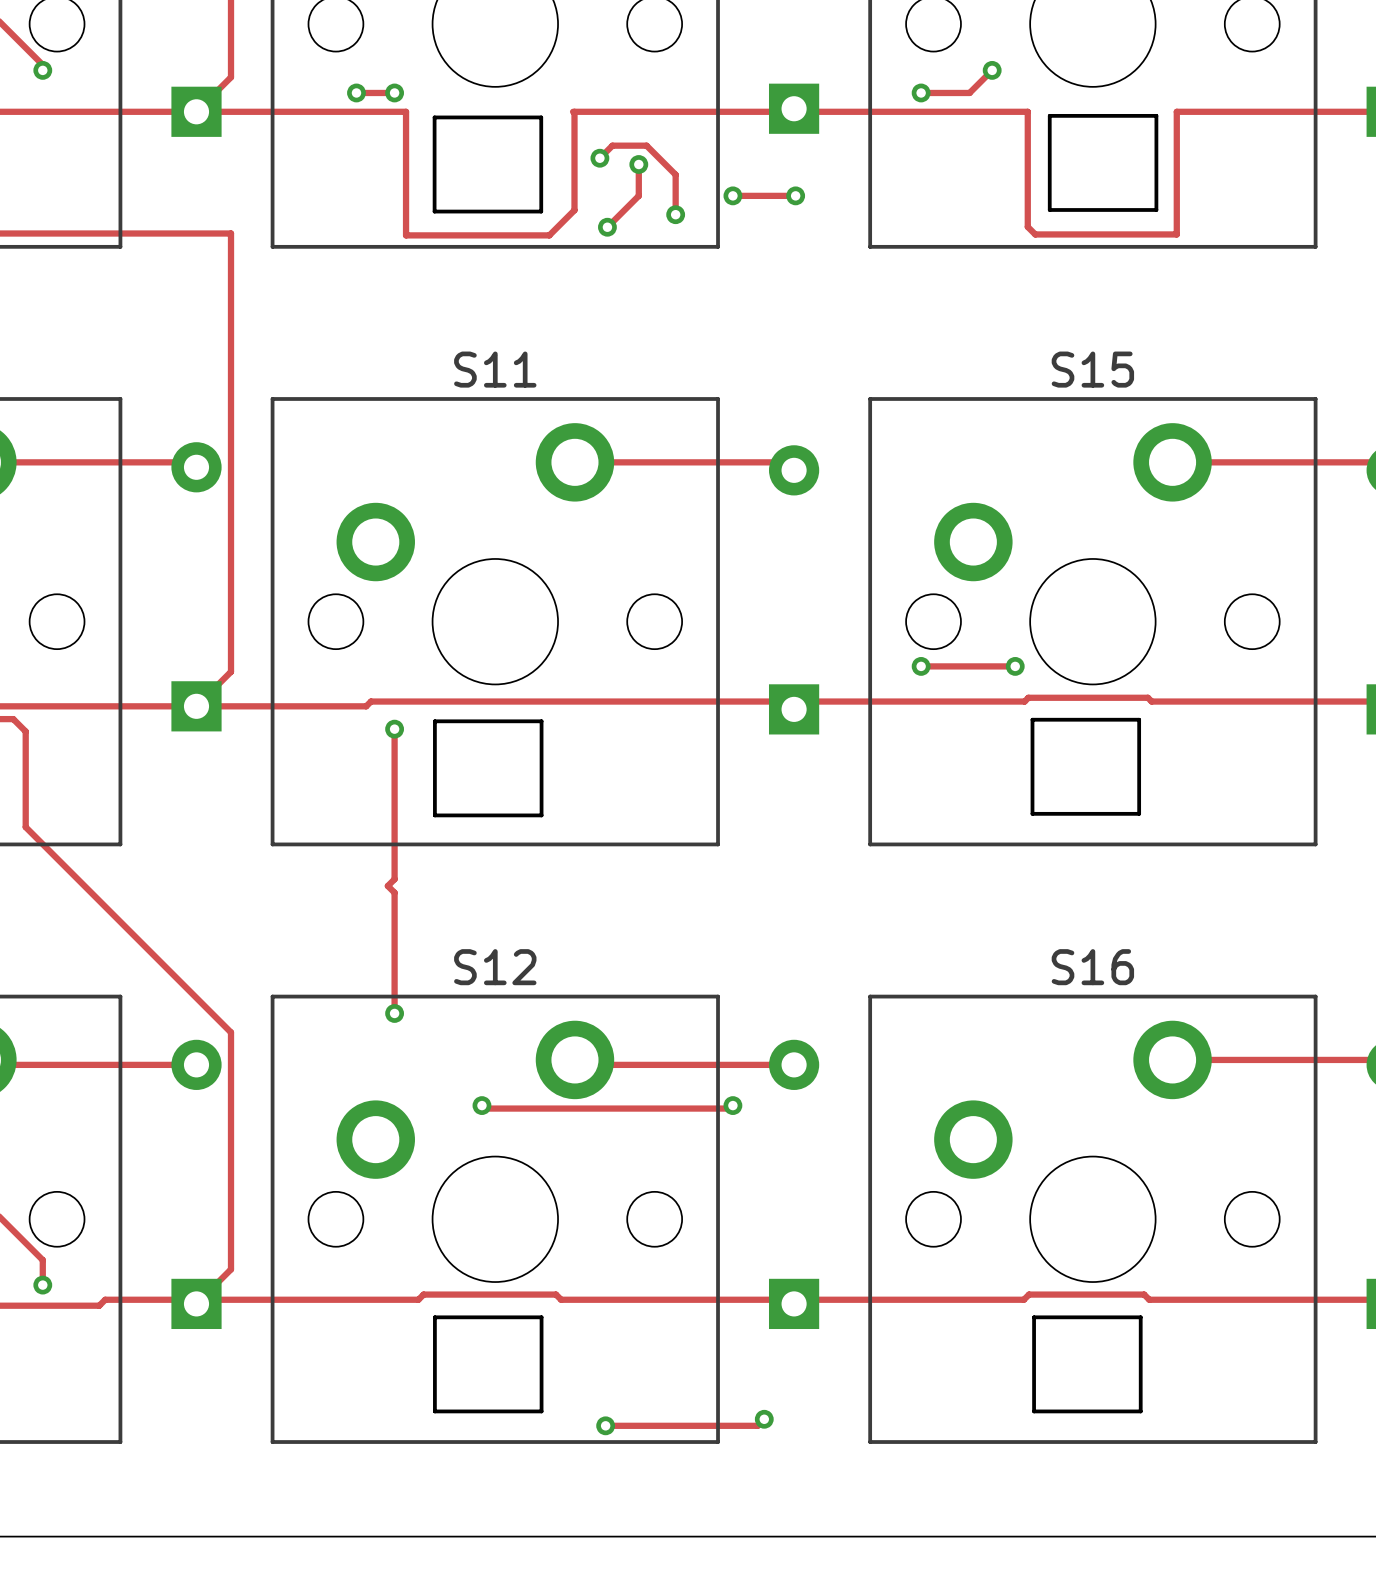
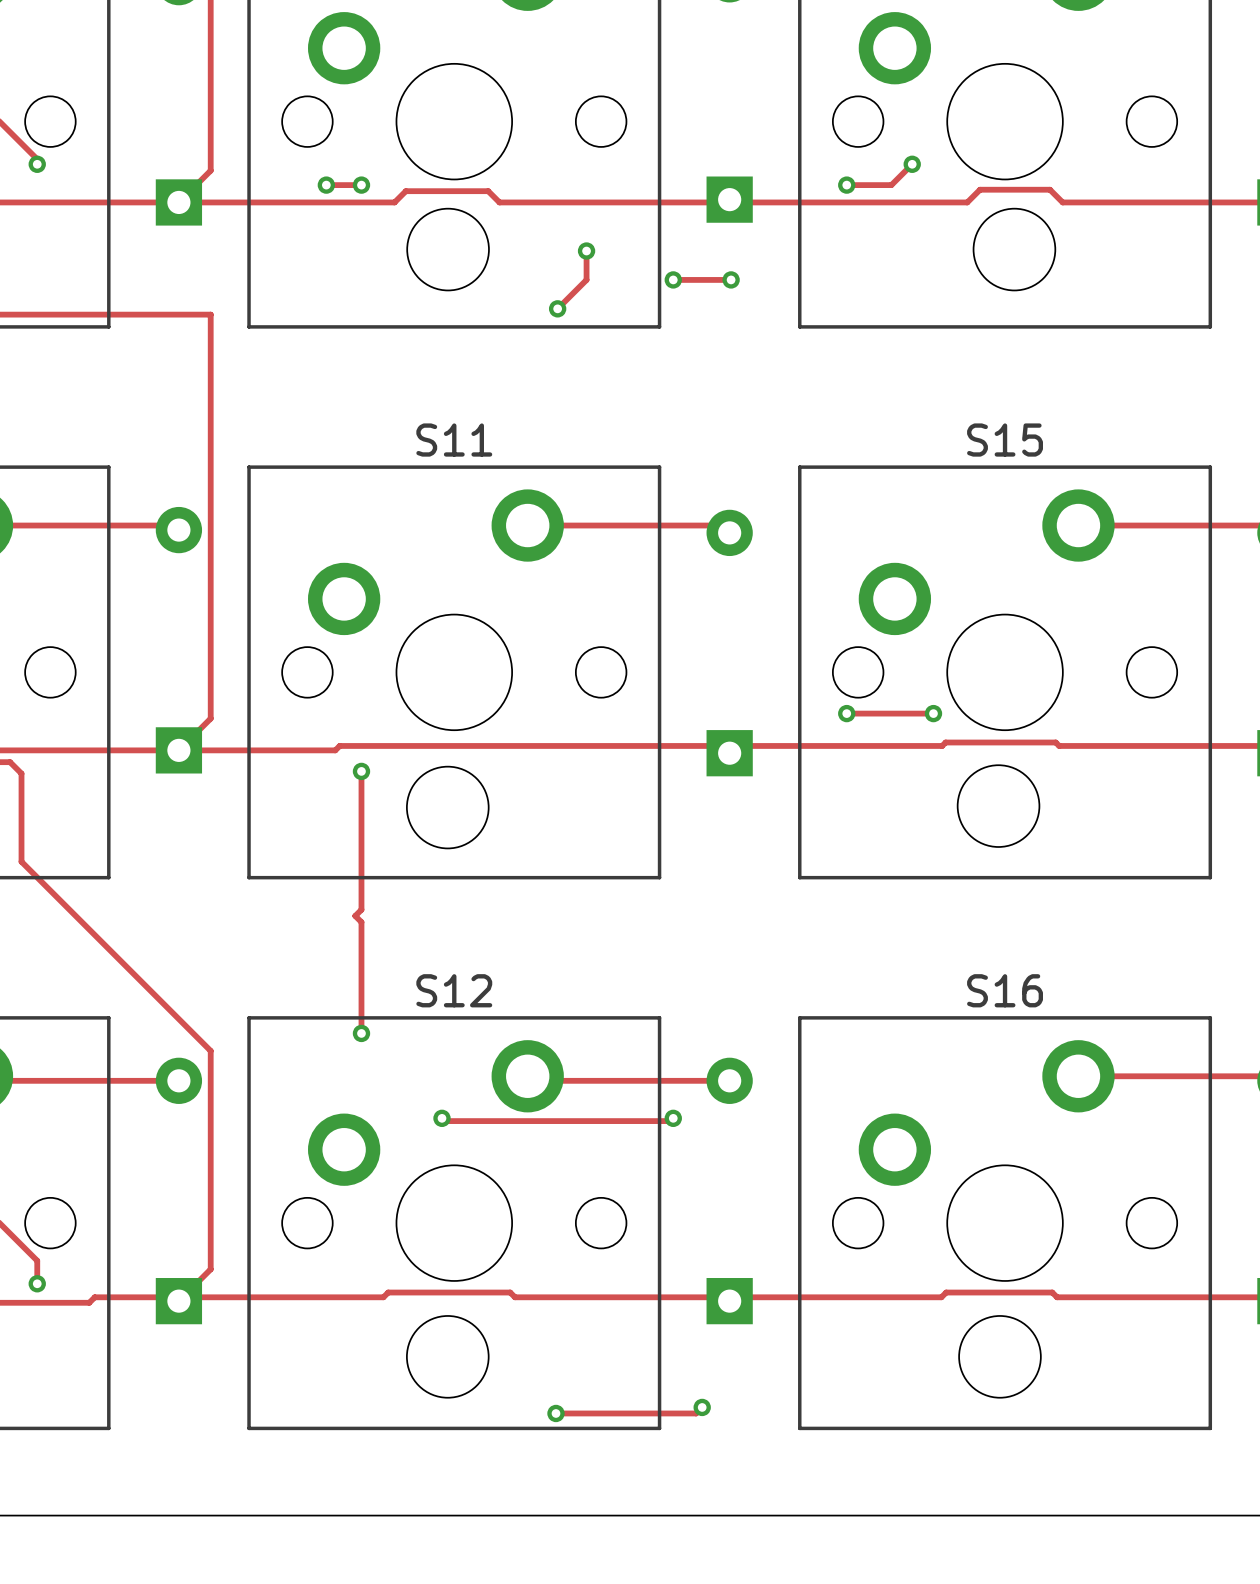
track: (406, 111) (406, 235) (549, 235) (574, 210) (574, 111) -> (372, 202) (394, 202) (405, 191) (488, 191) (499, 202) (525, 202)
track: (1027, 111) (1027, 226) (1035, 234) (1176, 234) (1176, 111) -> (945, 202) (967, 202) (980, 189) (1049, 189) (1062, 202) (1082, 202)
part footprint: [1047, 113, 1159, 212] -> [972, 207, 1057, 292]
part footprint: [432, 115, 544, 214] -> [406, 207, 490, 292]
track: (599, 158) (612, 145) (646, 145) (675, 174) (675, 214) -> none
via: (599, 158) -> none
via: (675, 214) -> none
part footprint: [1030, 717, 1142, 816] -> [956, 764, 1041, 848]
part footprint: [433, 719, 544, 818] -> [406, 765, 490, 850]
part footprint: [433, 1315, 544, 1414] -> [406, 1315, 490, 1399]
part footprint: [1032, 1315, 1143, 1414] -> [958, 1315, 1042, 1399]

